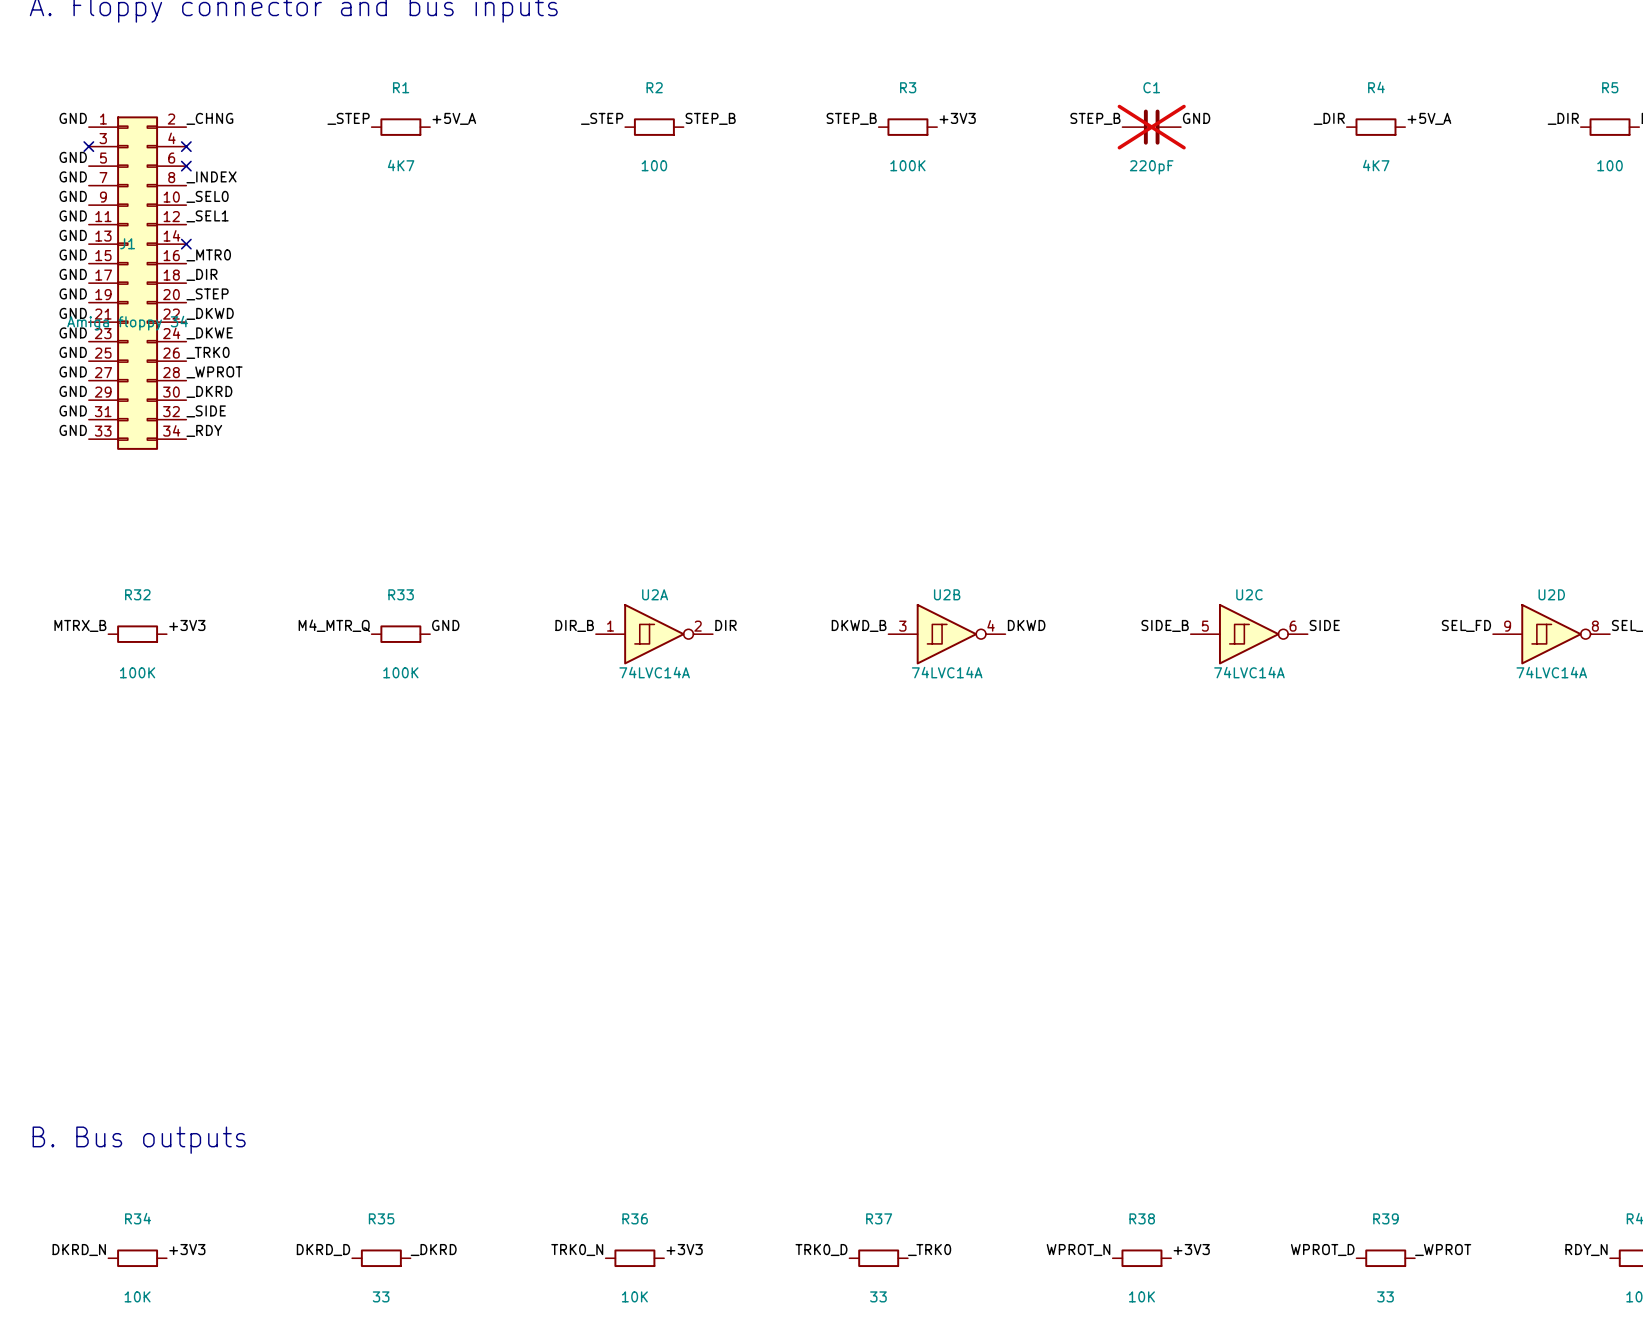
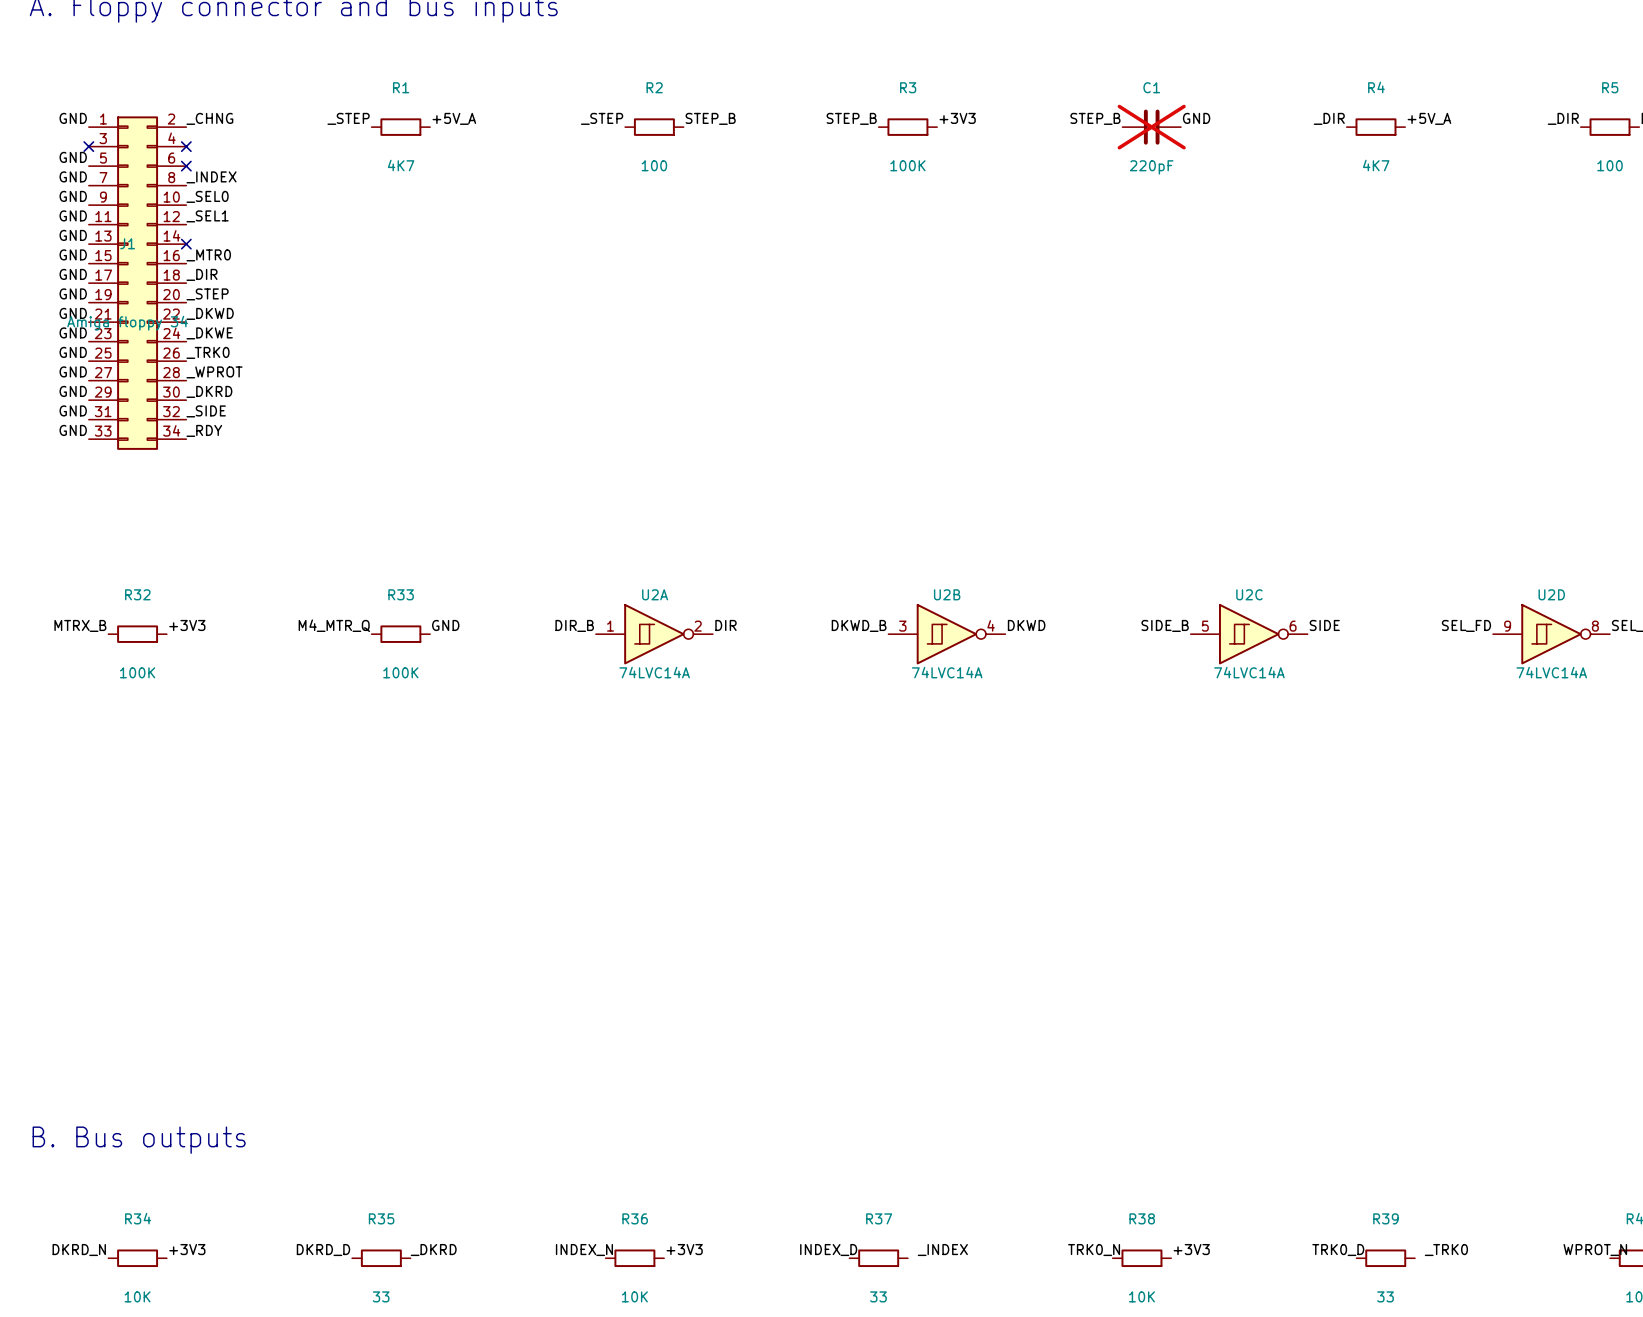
label: TRK0_N (577, 1250) -> none
label: none -> INDEX_N (584, 1250)
label: TRK0_D (821, 1250) -> none
label: none -> INDEX_D (828, 1250)
label: _TRK0 (929, 1250) -> none
label: none -> _INDEX (942, 1250)
label: WPROT_N (1078, 1250) -> none
label: none -> TRK0_N (1094, 1250)
label: WPROT_D (1322, 1250) -> none
label: none -> TRK0_D (1338, 1250)
label: _WPROT (1443, 1250) -> none
label: none -> _TRK0 (1446, 1250)
label: RDY_N (1586, 1250) -> none
label: none -> WPROT_N (1595, 1250)

